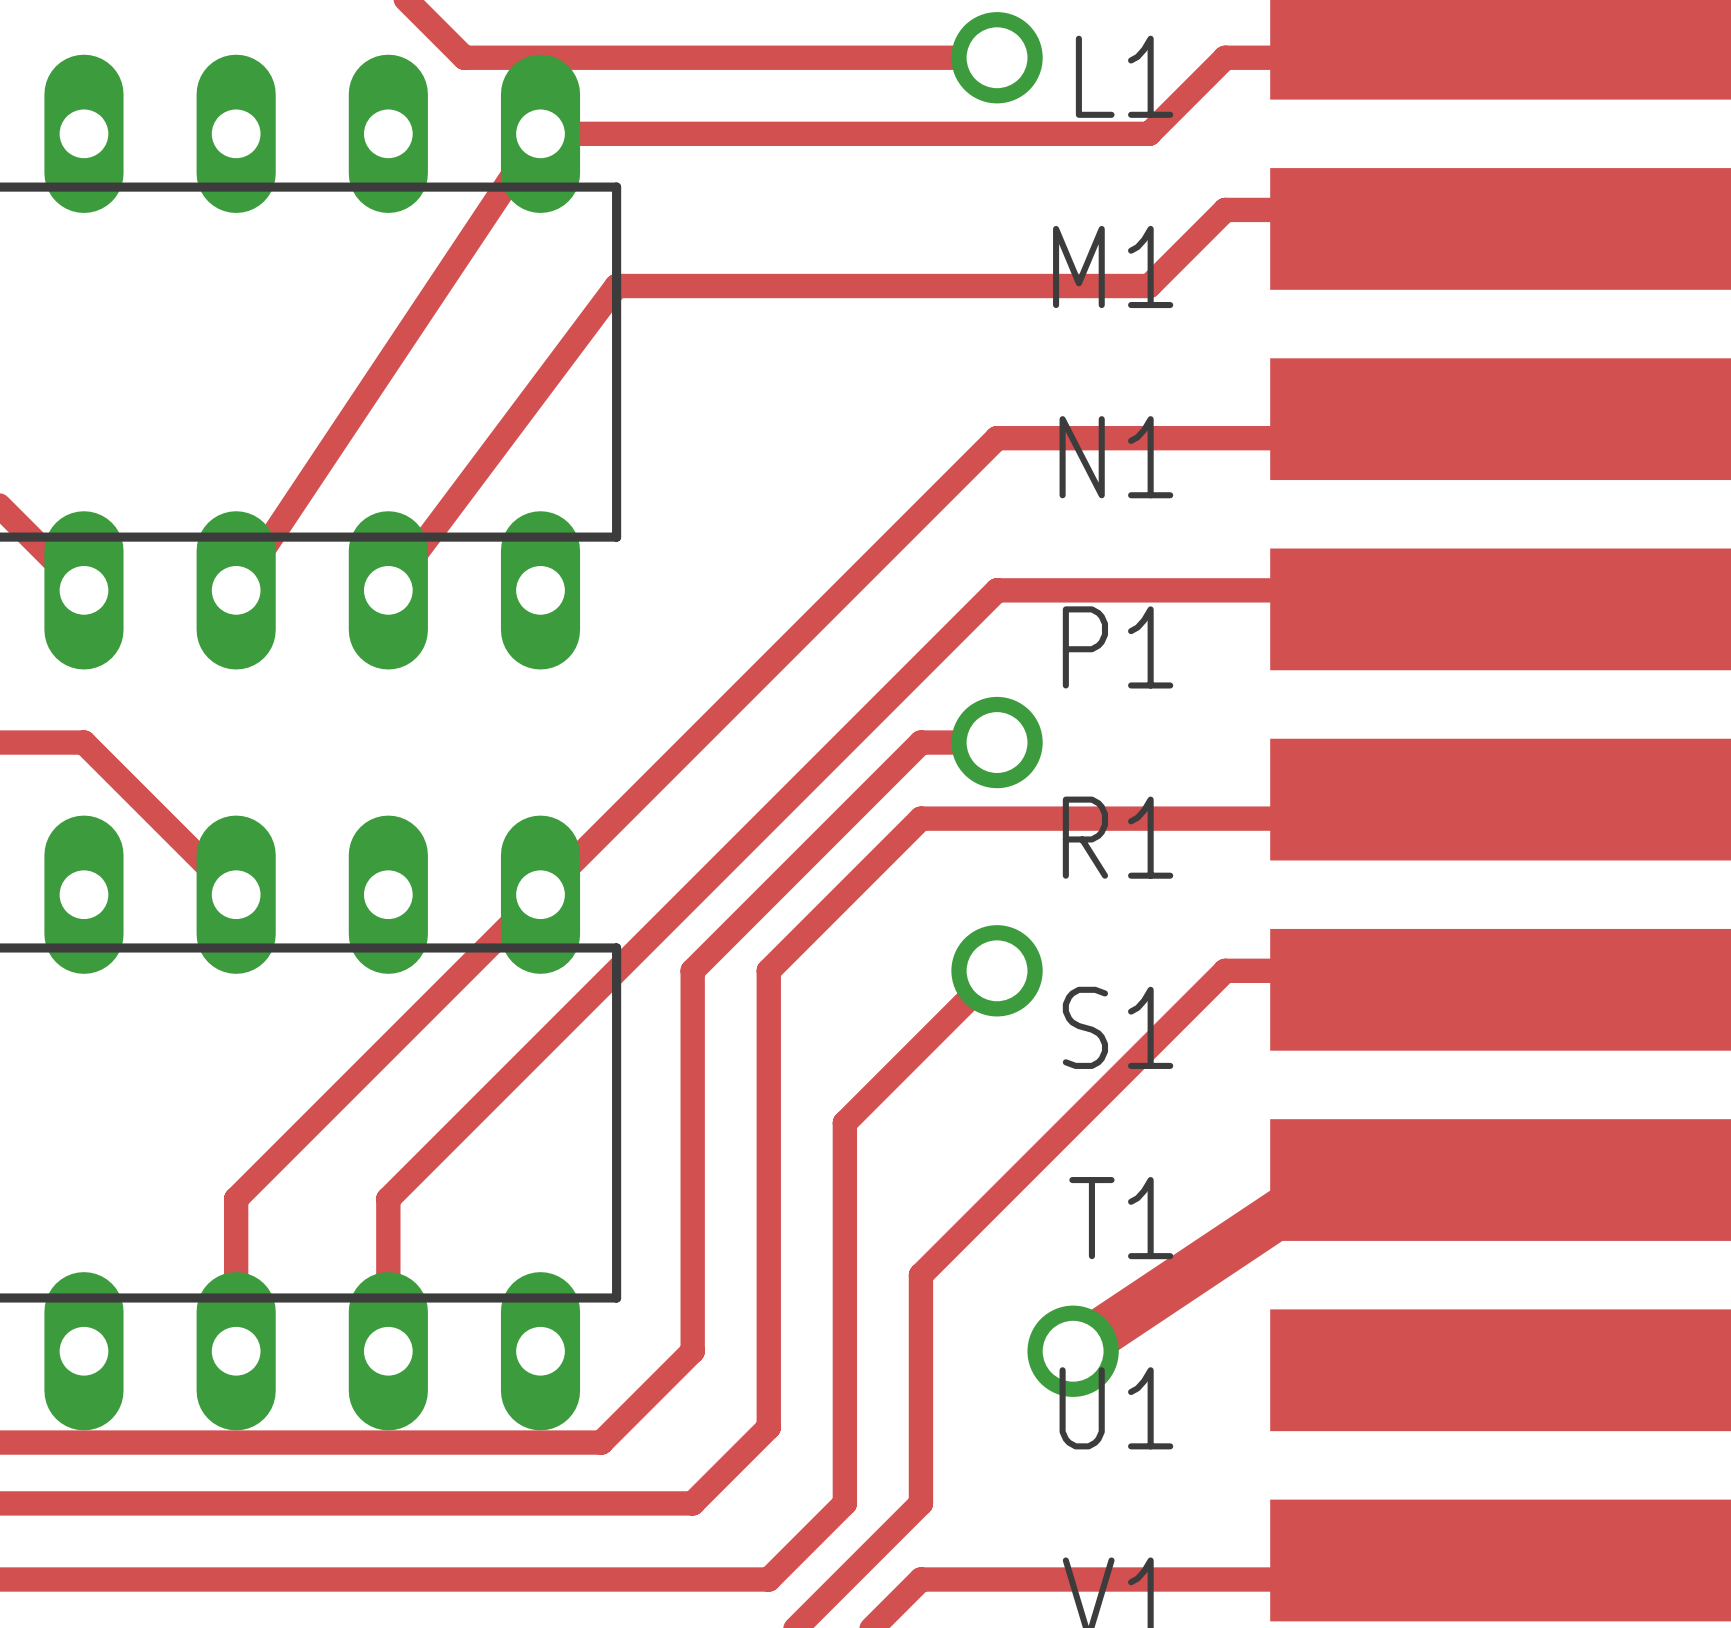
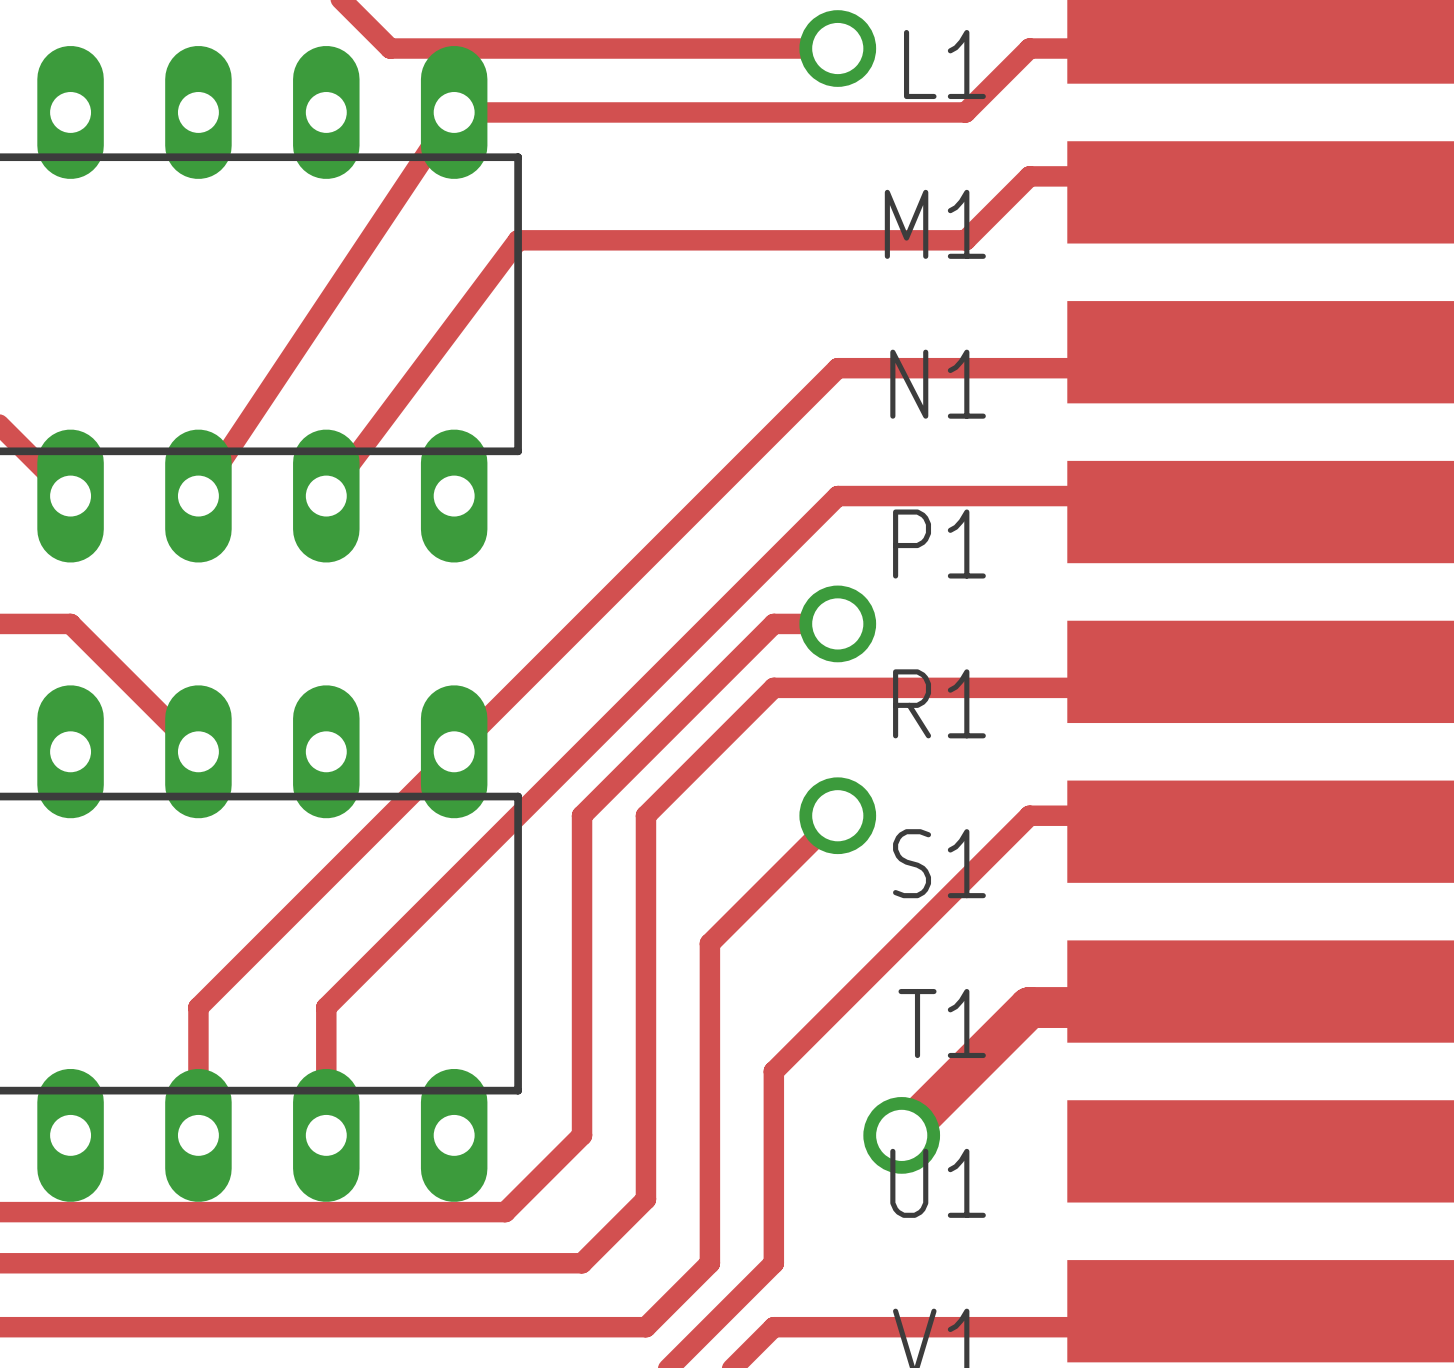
track: (1301, 1199) (1073, 1351) -> (1093, 1007) (1029, 1007) (901, 1135)

